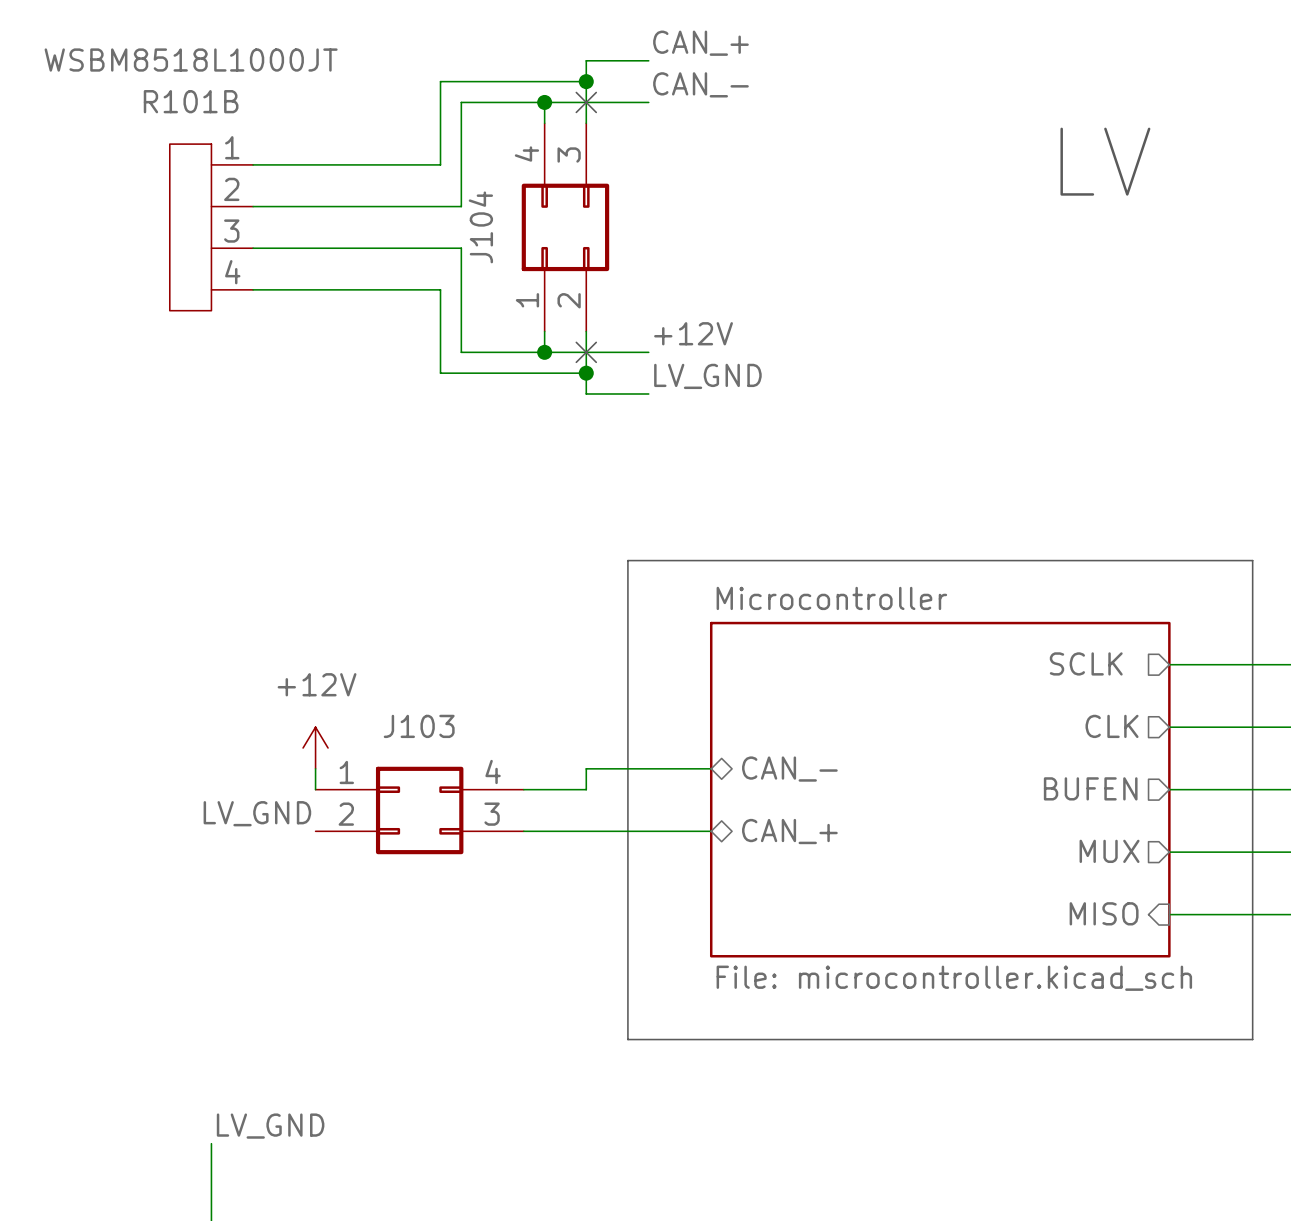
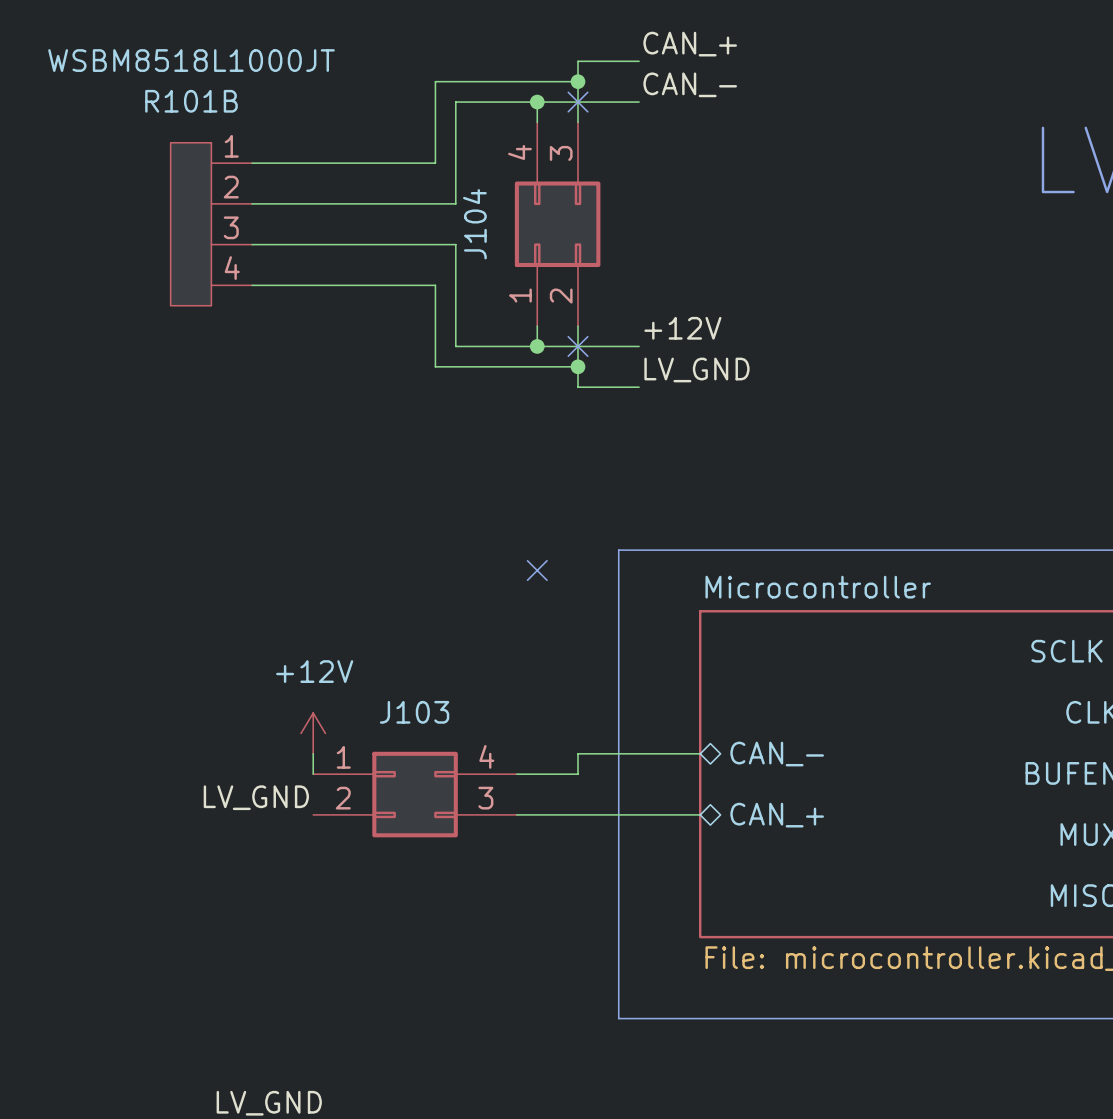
no-connect mark: none -> (537, 570)

